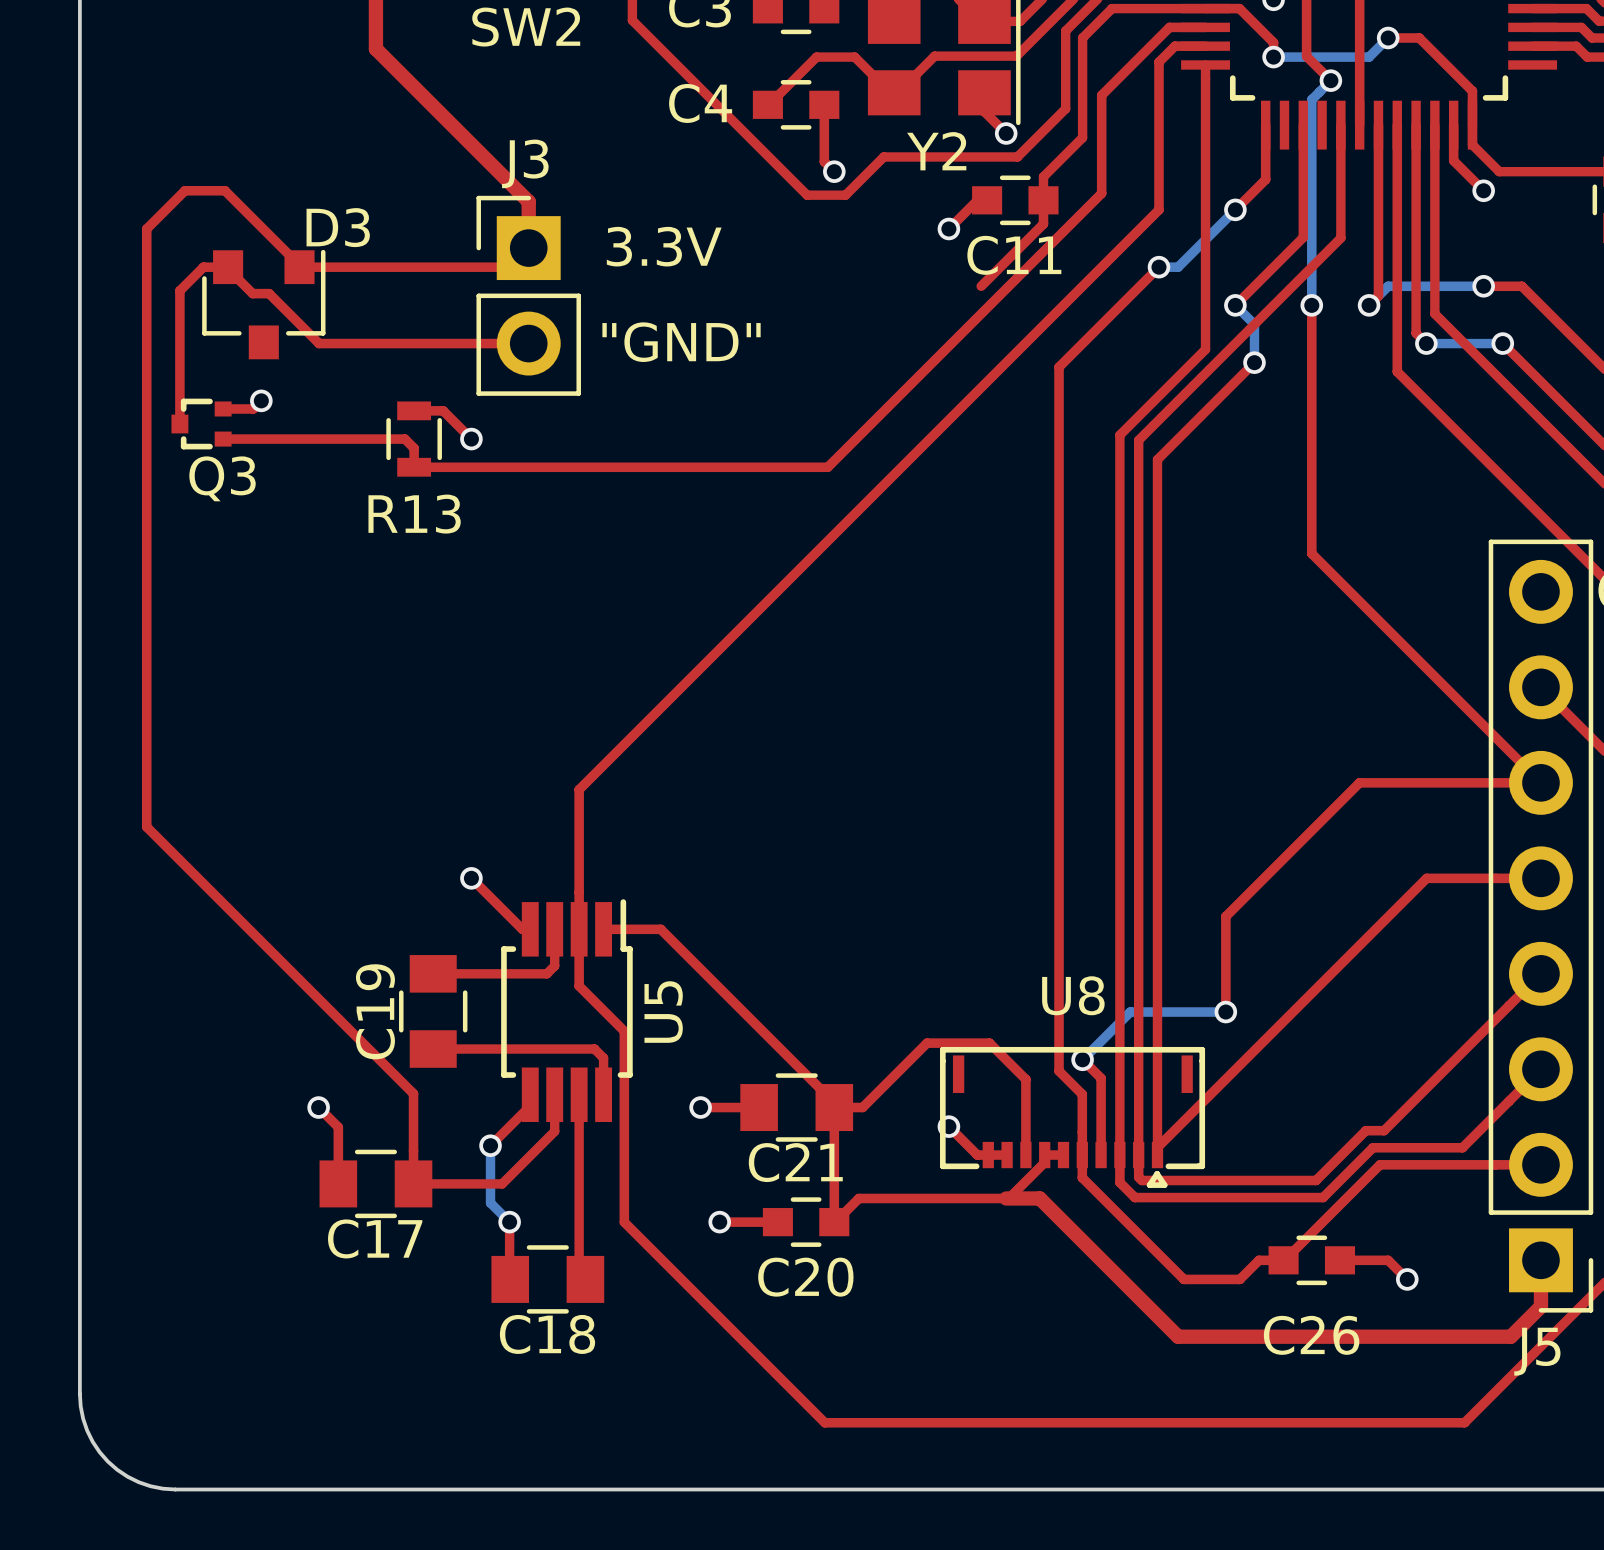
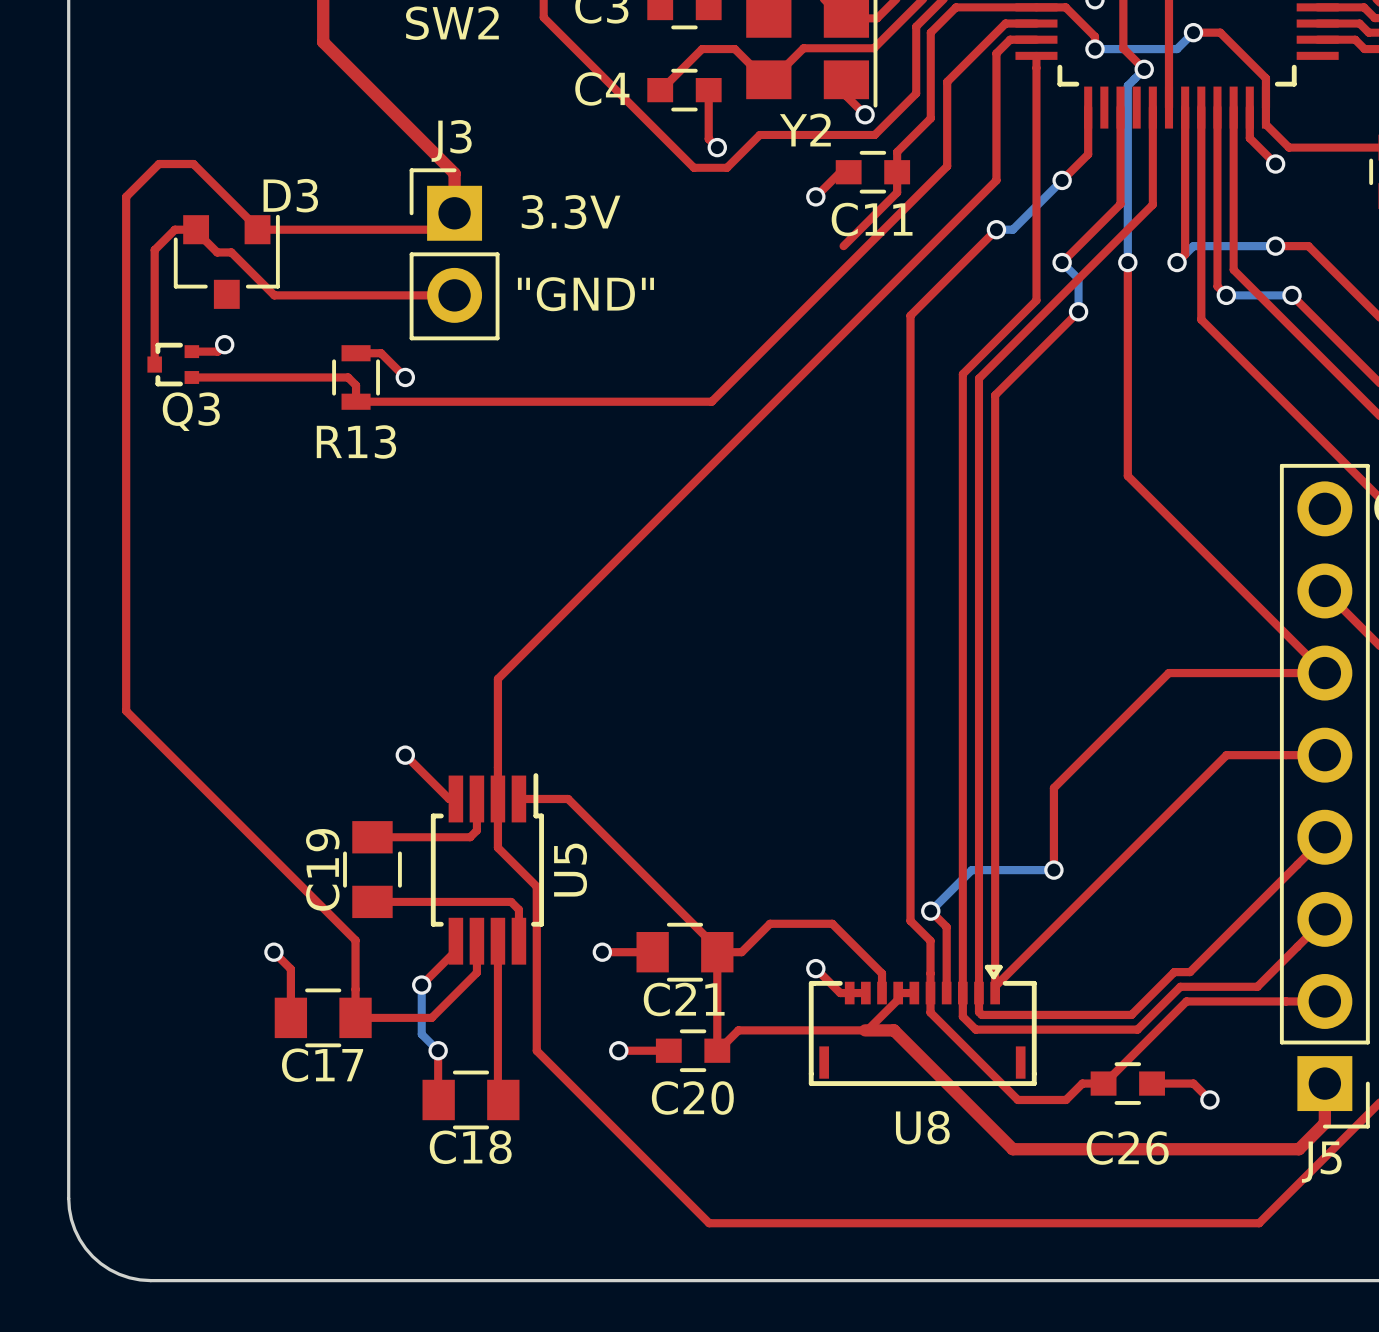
U8 name position: U8 (1073, 995) -> U8 (922, 1127)
U8 footprint: [939, 1046, 1206, 1188] -> [808, 964, 1037, 1086]
top track: (895, 1074) (927, 1043) (989, 1043) (1025, 1079) (1025, 1132) -> (770, 923) (832, 923) (882, 973)

